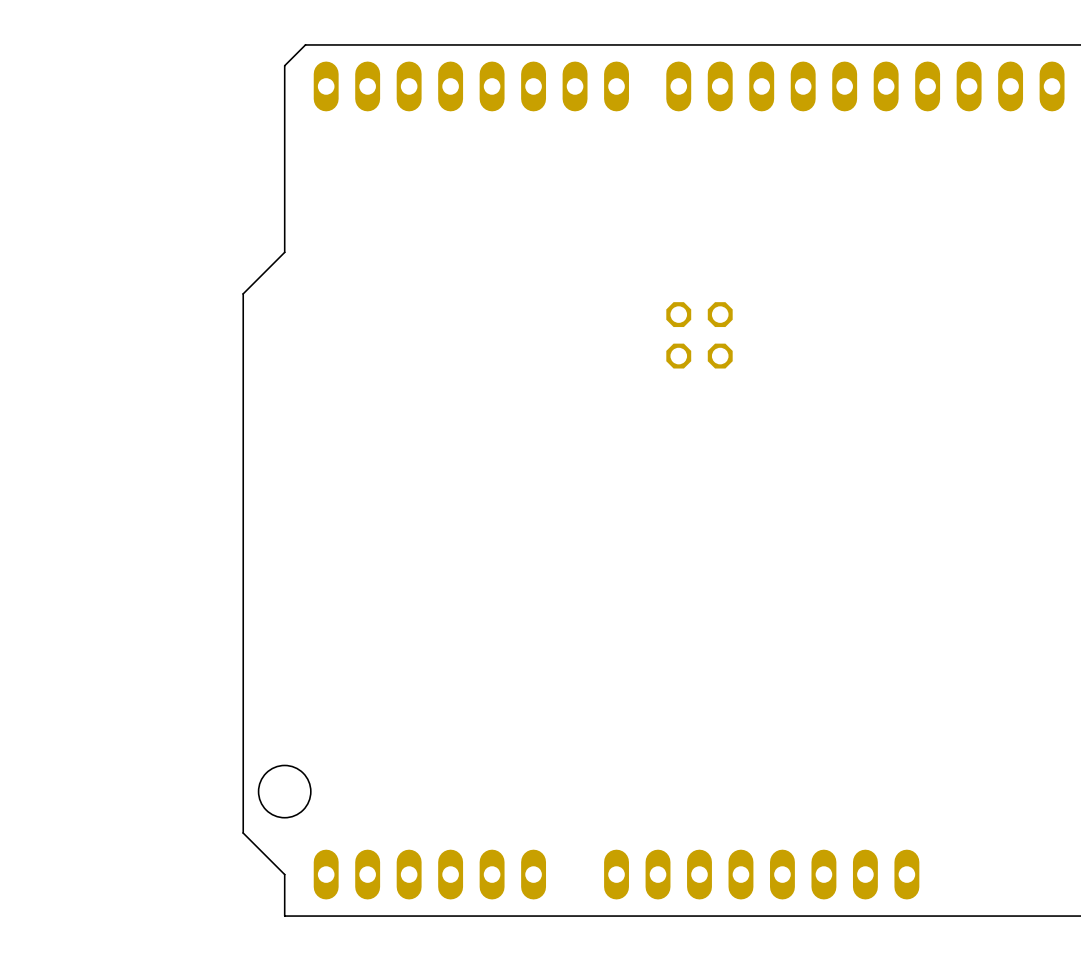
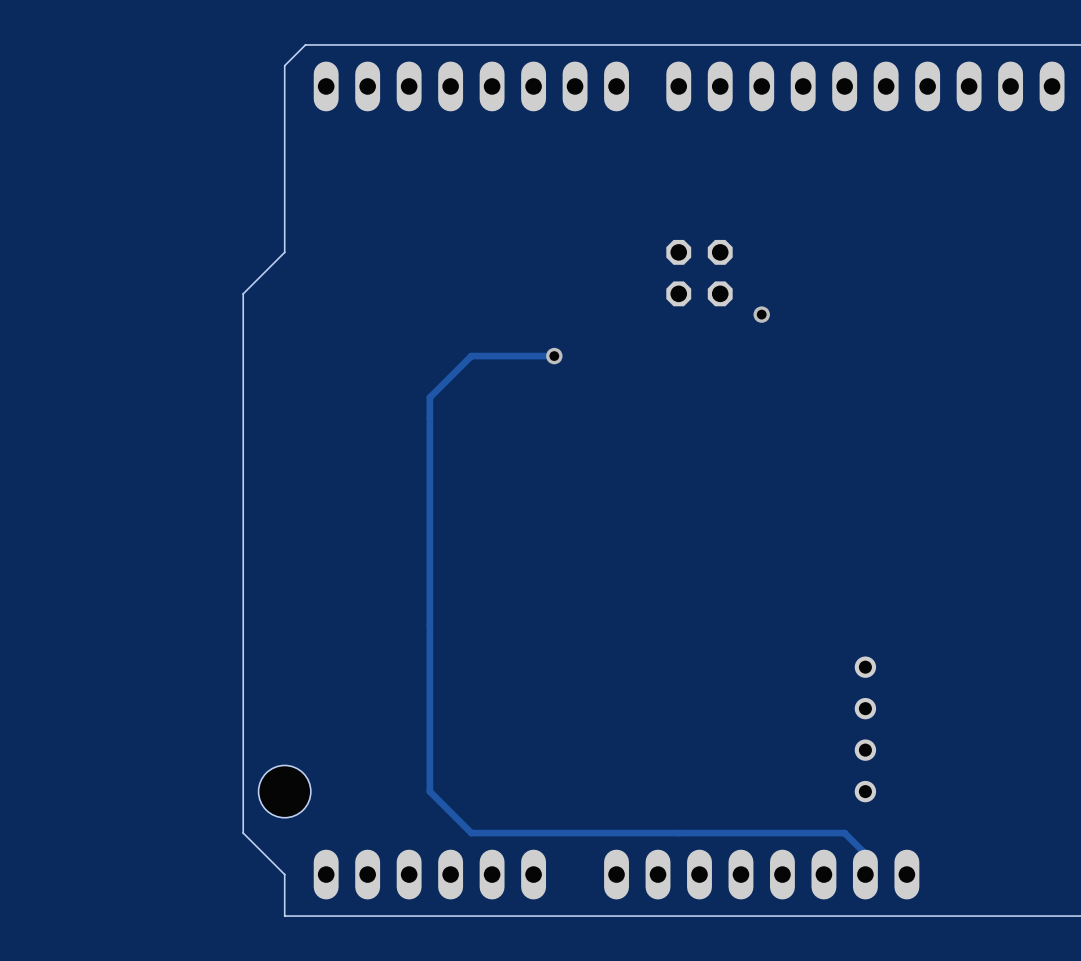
via: none -> (761, 314)
part position: (699, 335) -> (699, 273)
track: none -> (554, 356) (471, 356) (429, 397) (429, 791) (471, 833) (844, 833) (865, 853) (865, 874)
via: none -> (554, 356)
part: none -> (865, 729)

